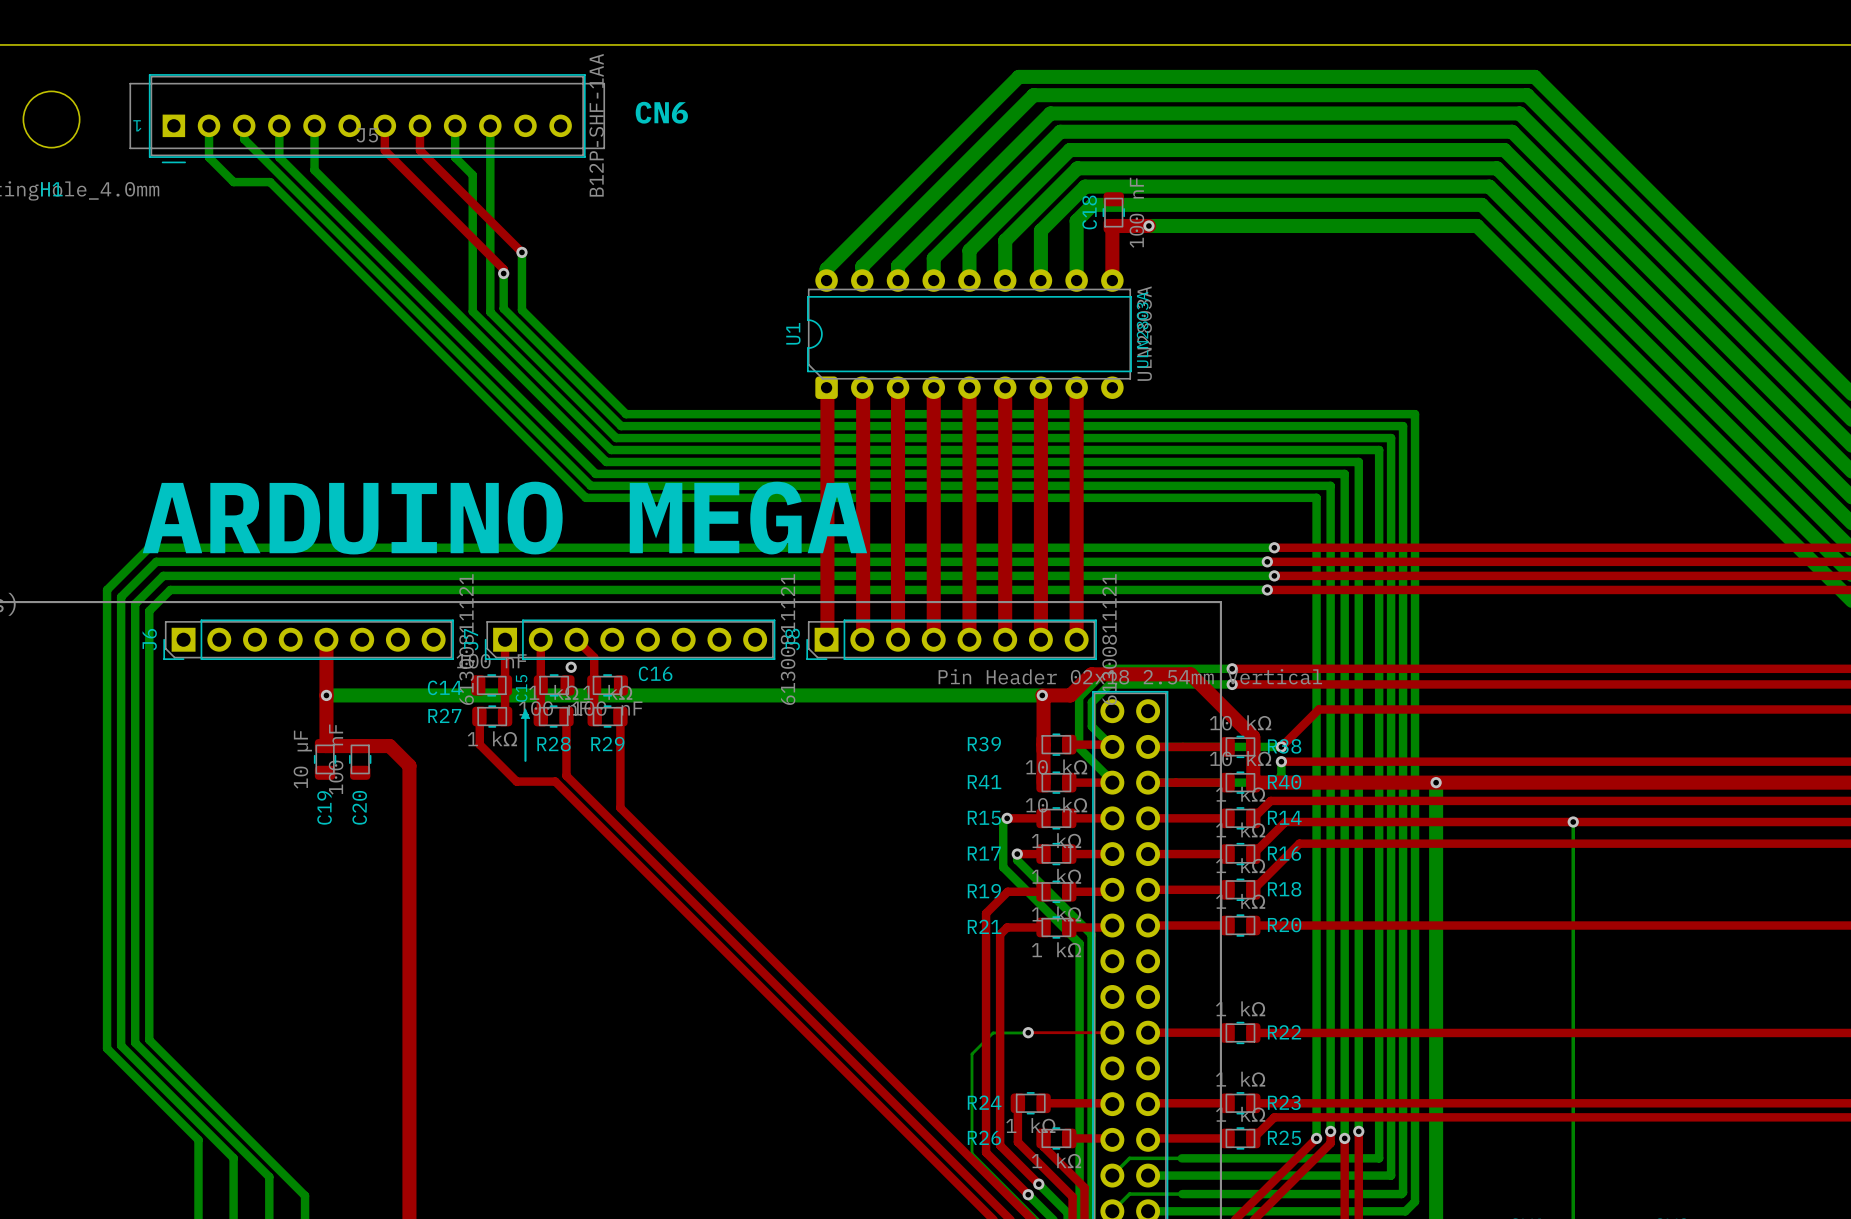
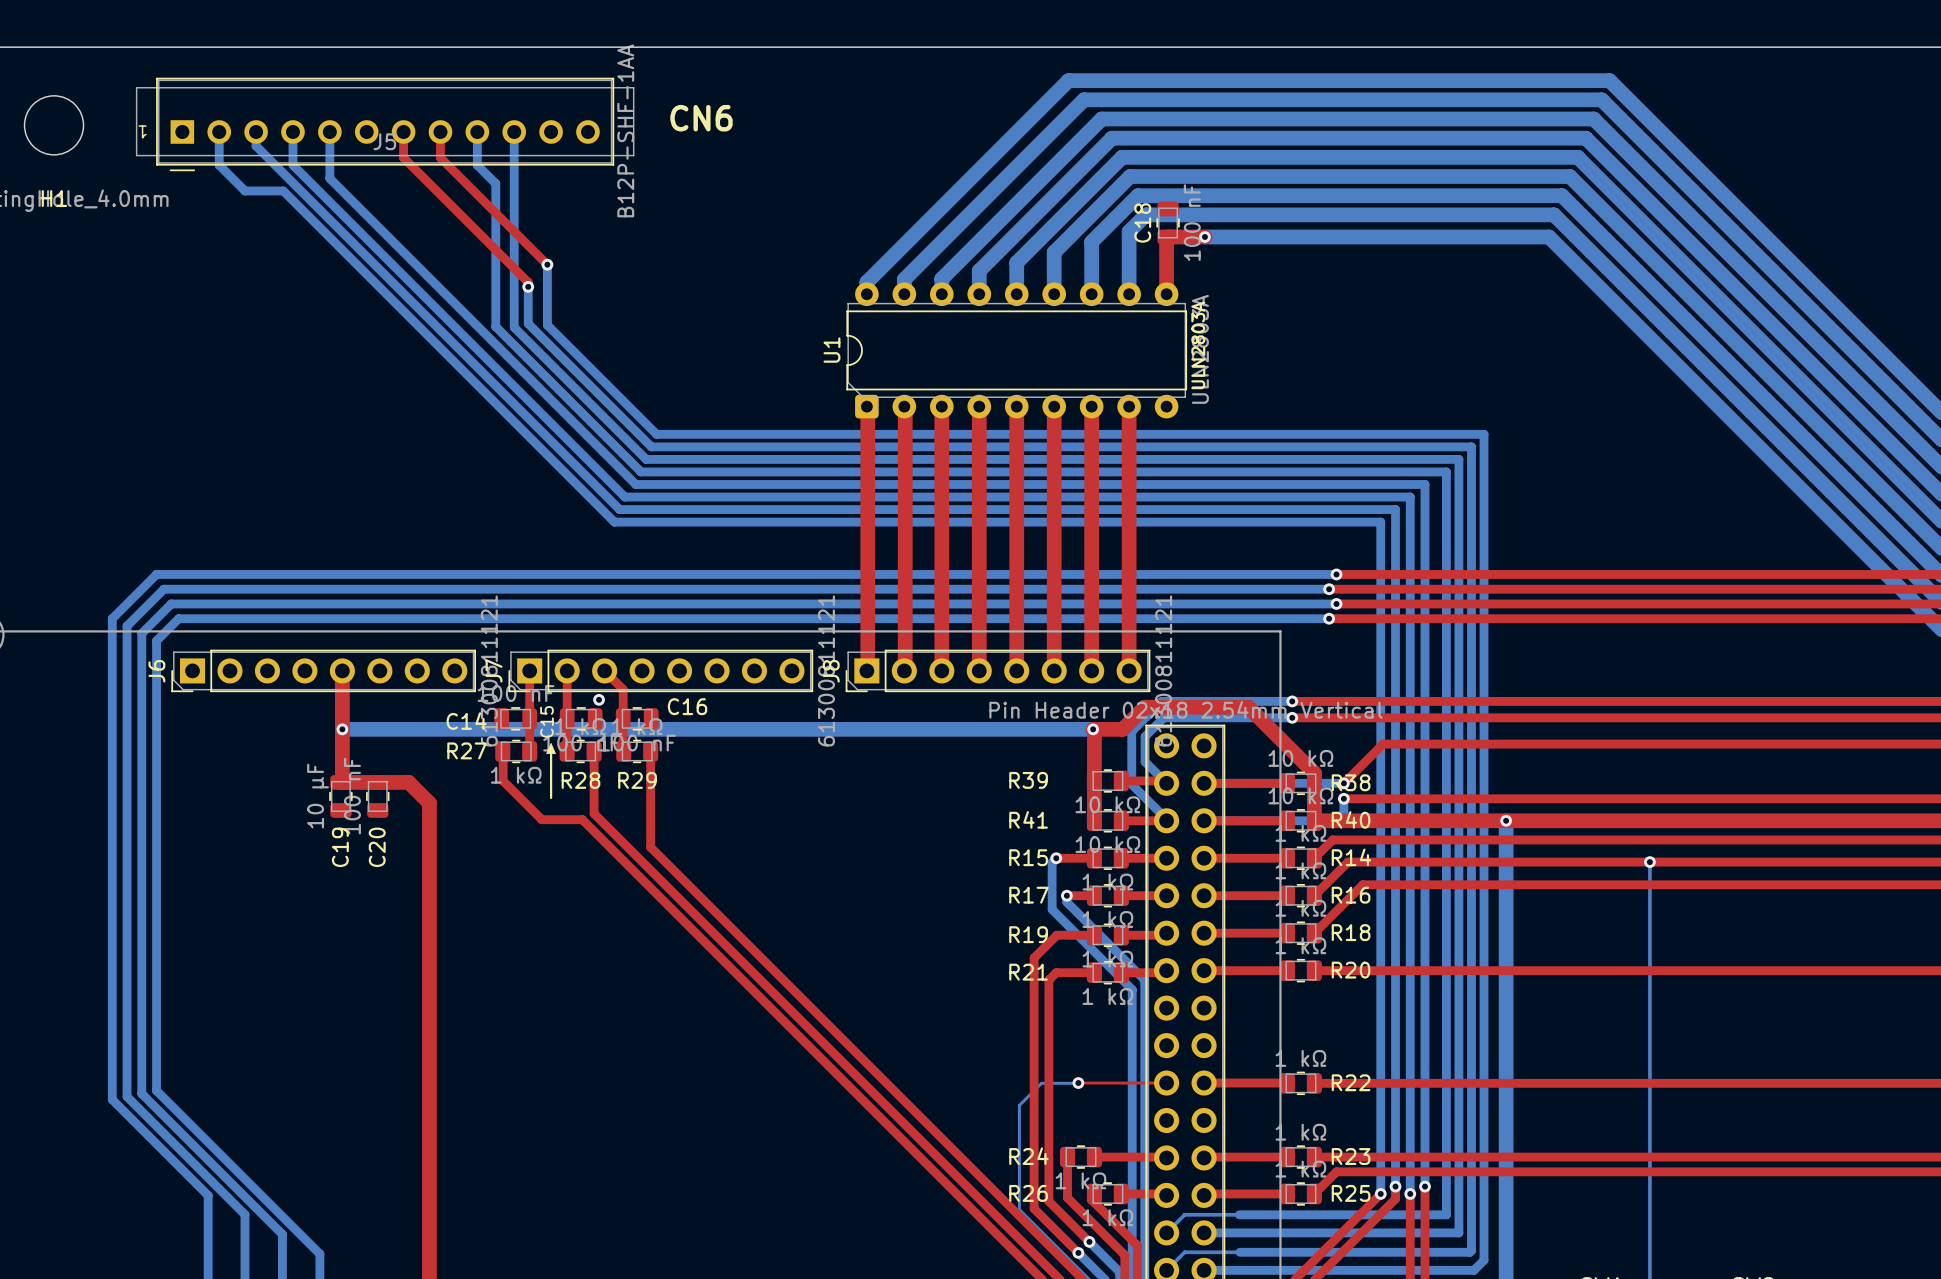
text: ARDUINO MEGA (504, 518) -> none

